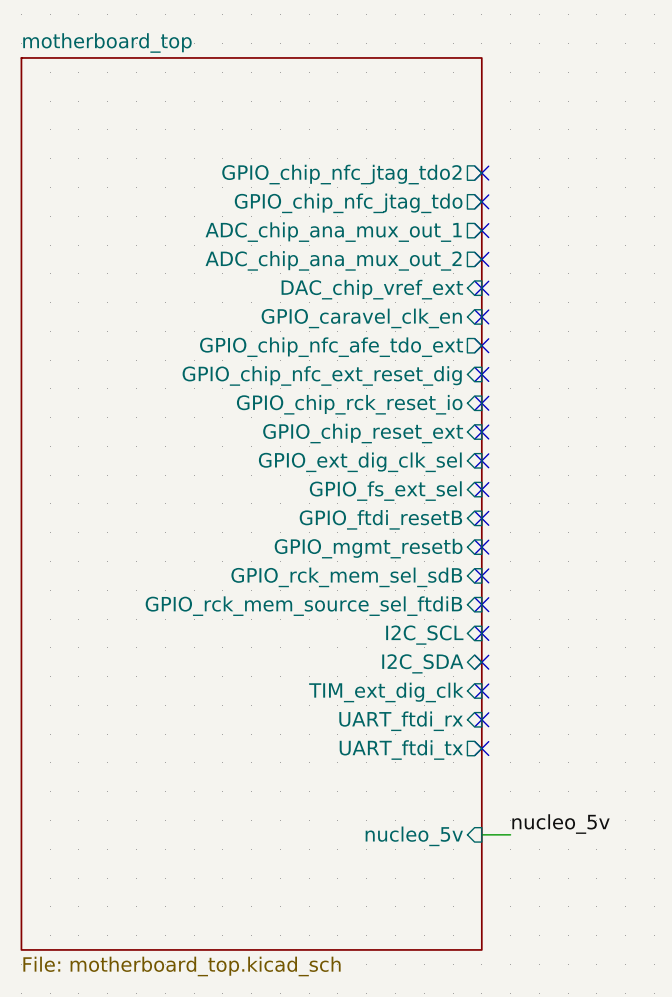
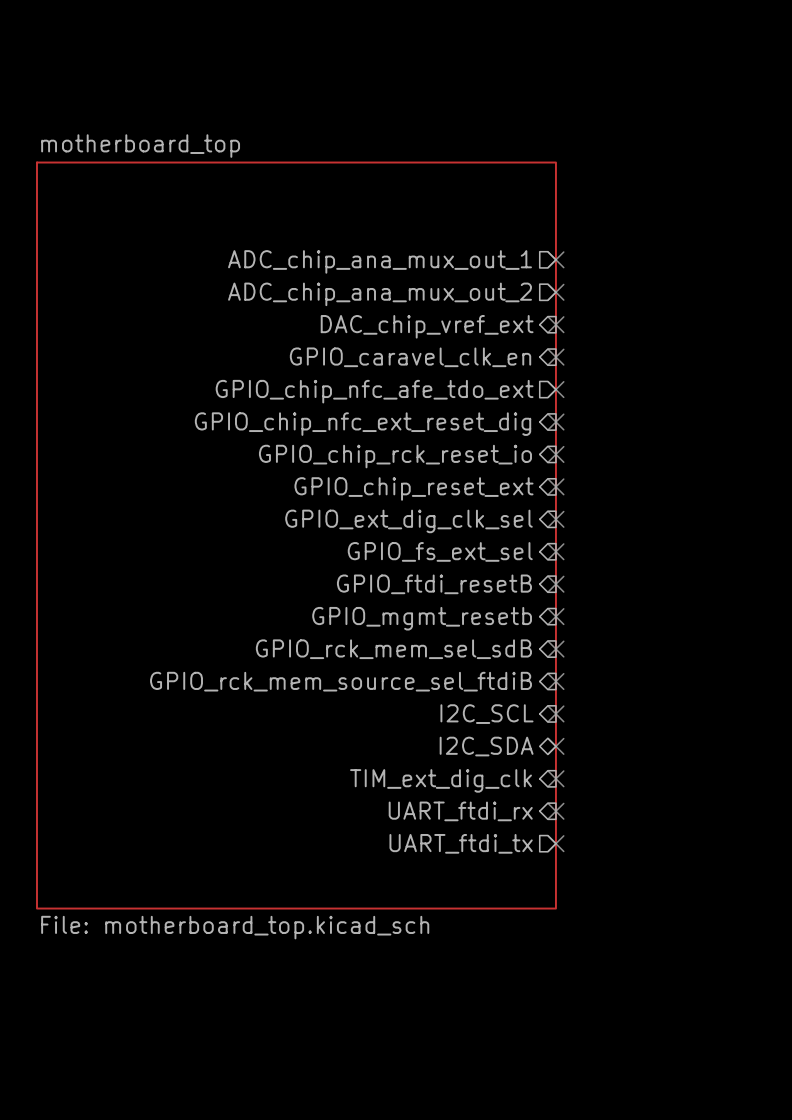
no-connect mark: (481, 173) -> none
sheet pin: GPIO_chip_nfc_jtag_tdo2 (341, 174) -> none
no-connect mark: (481, 201) -> none
sheet pin: GPIO_chip_nfc_jtag_tdo (348, 203) -> none
sheet motherboard_top: none -> File: motherboard_top.kicad_sch (296, 535)
sheet motherboard_top: File: motherboard_top.kicad_sch (251, 503) -> none
label: nucleo_5v (561, 824) -> none
wire: (481, 834) (510, 834) -> none
sheet pin: nucleo_5v (414, 836) -> none

